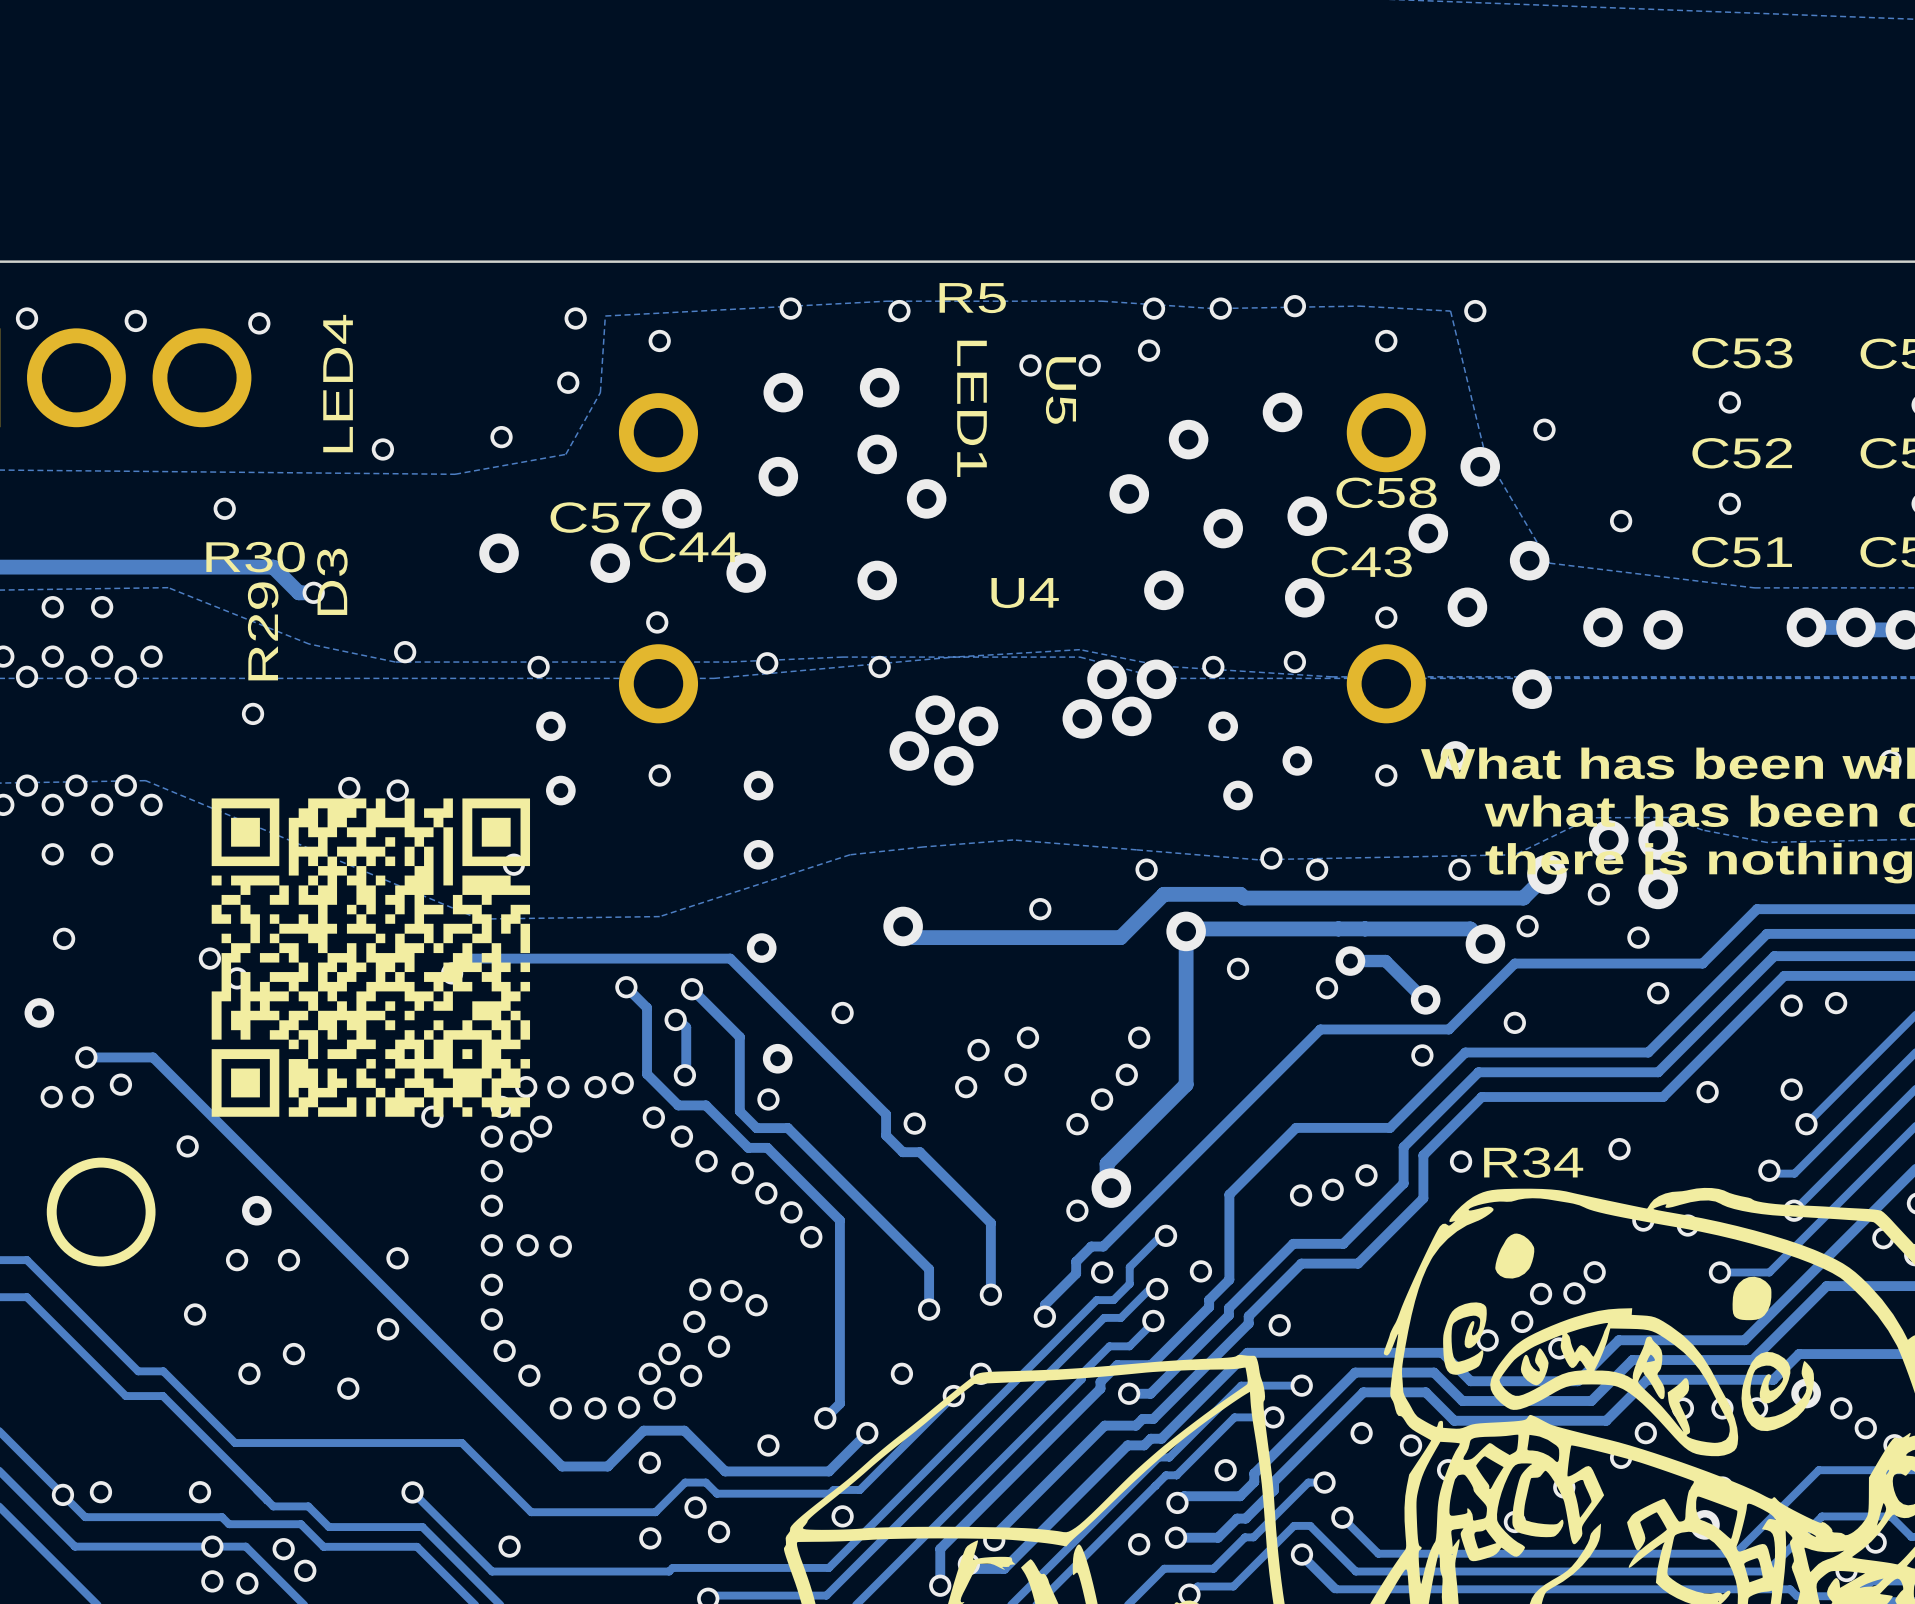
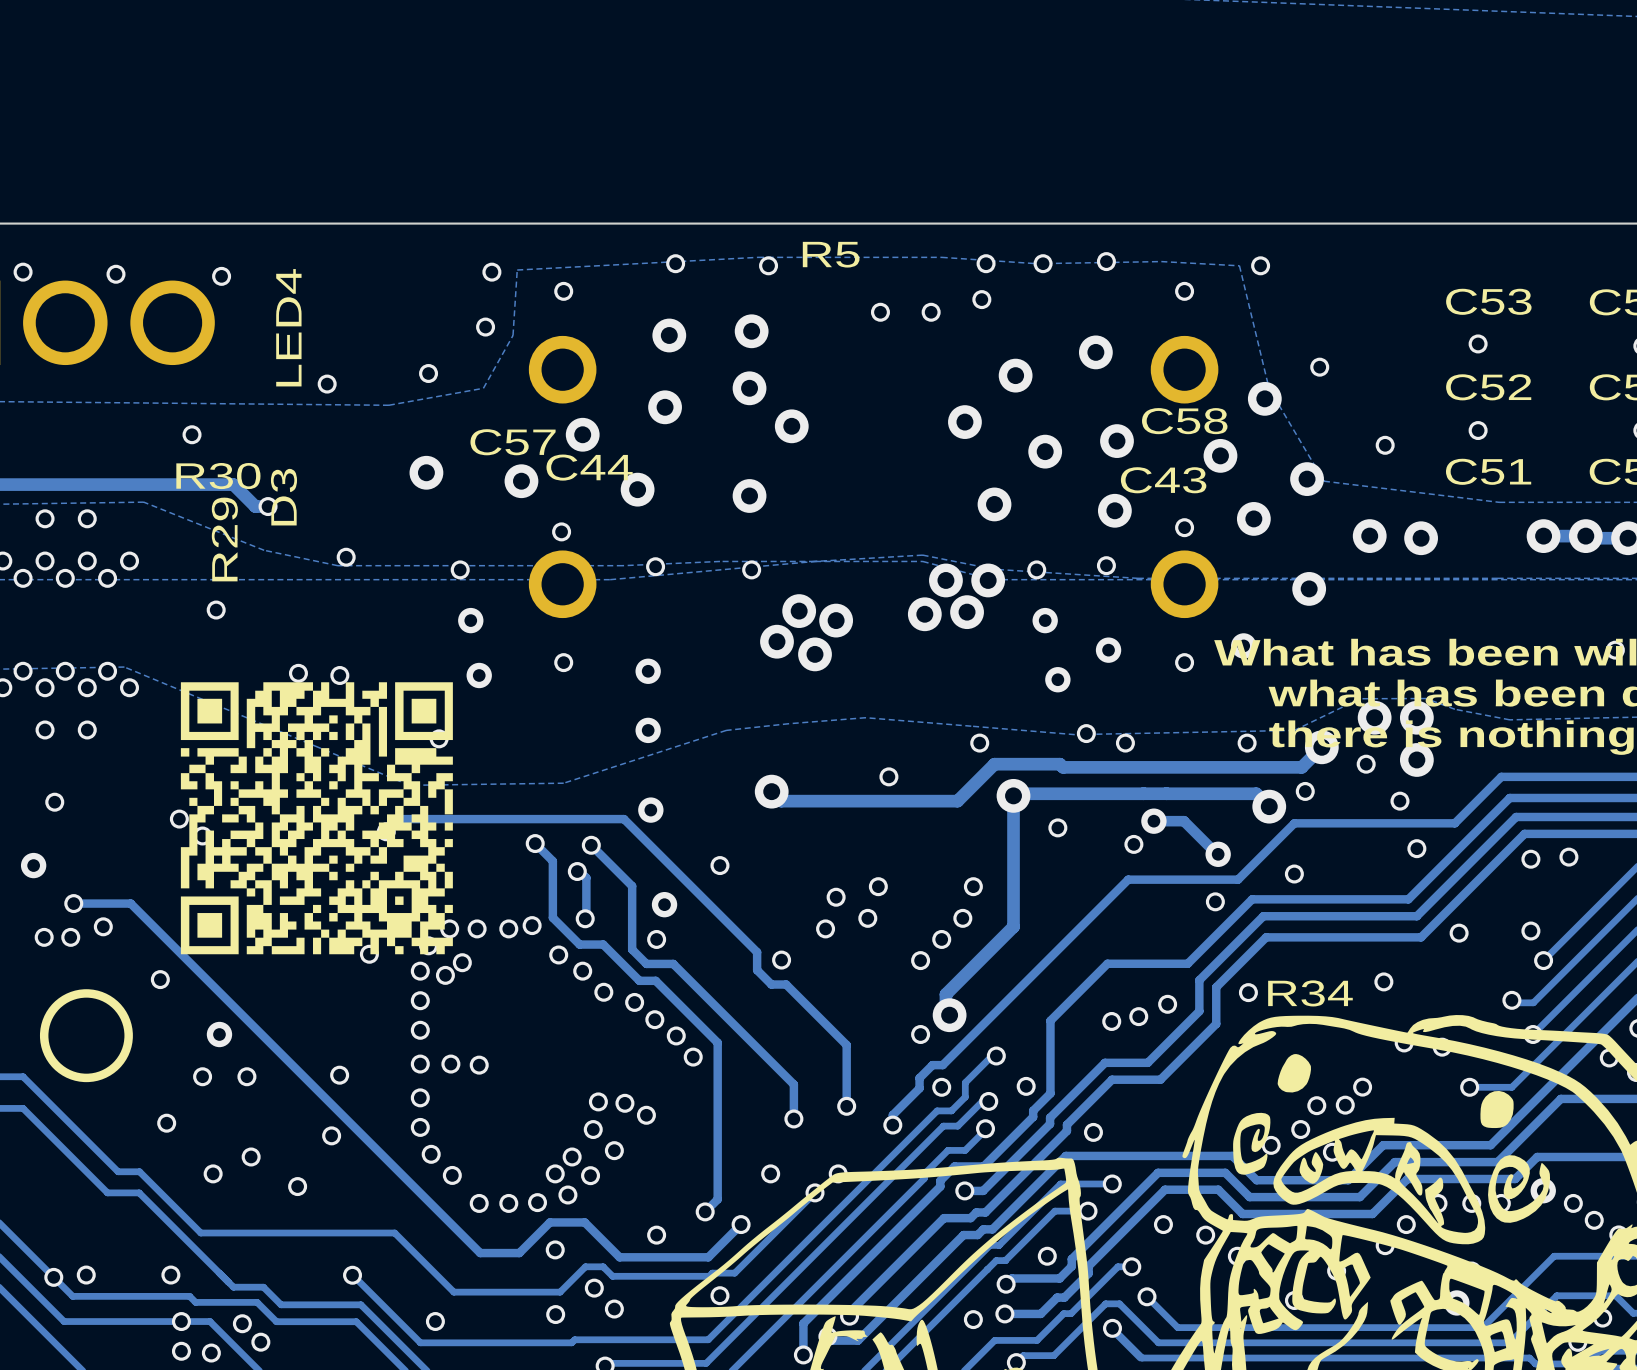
U5: (1060, 390) -> none
LED1: (971, 408) -> none
U4: (1025, 593) -> none

